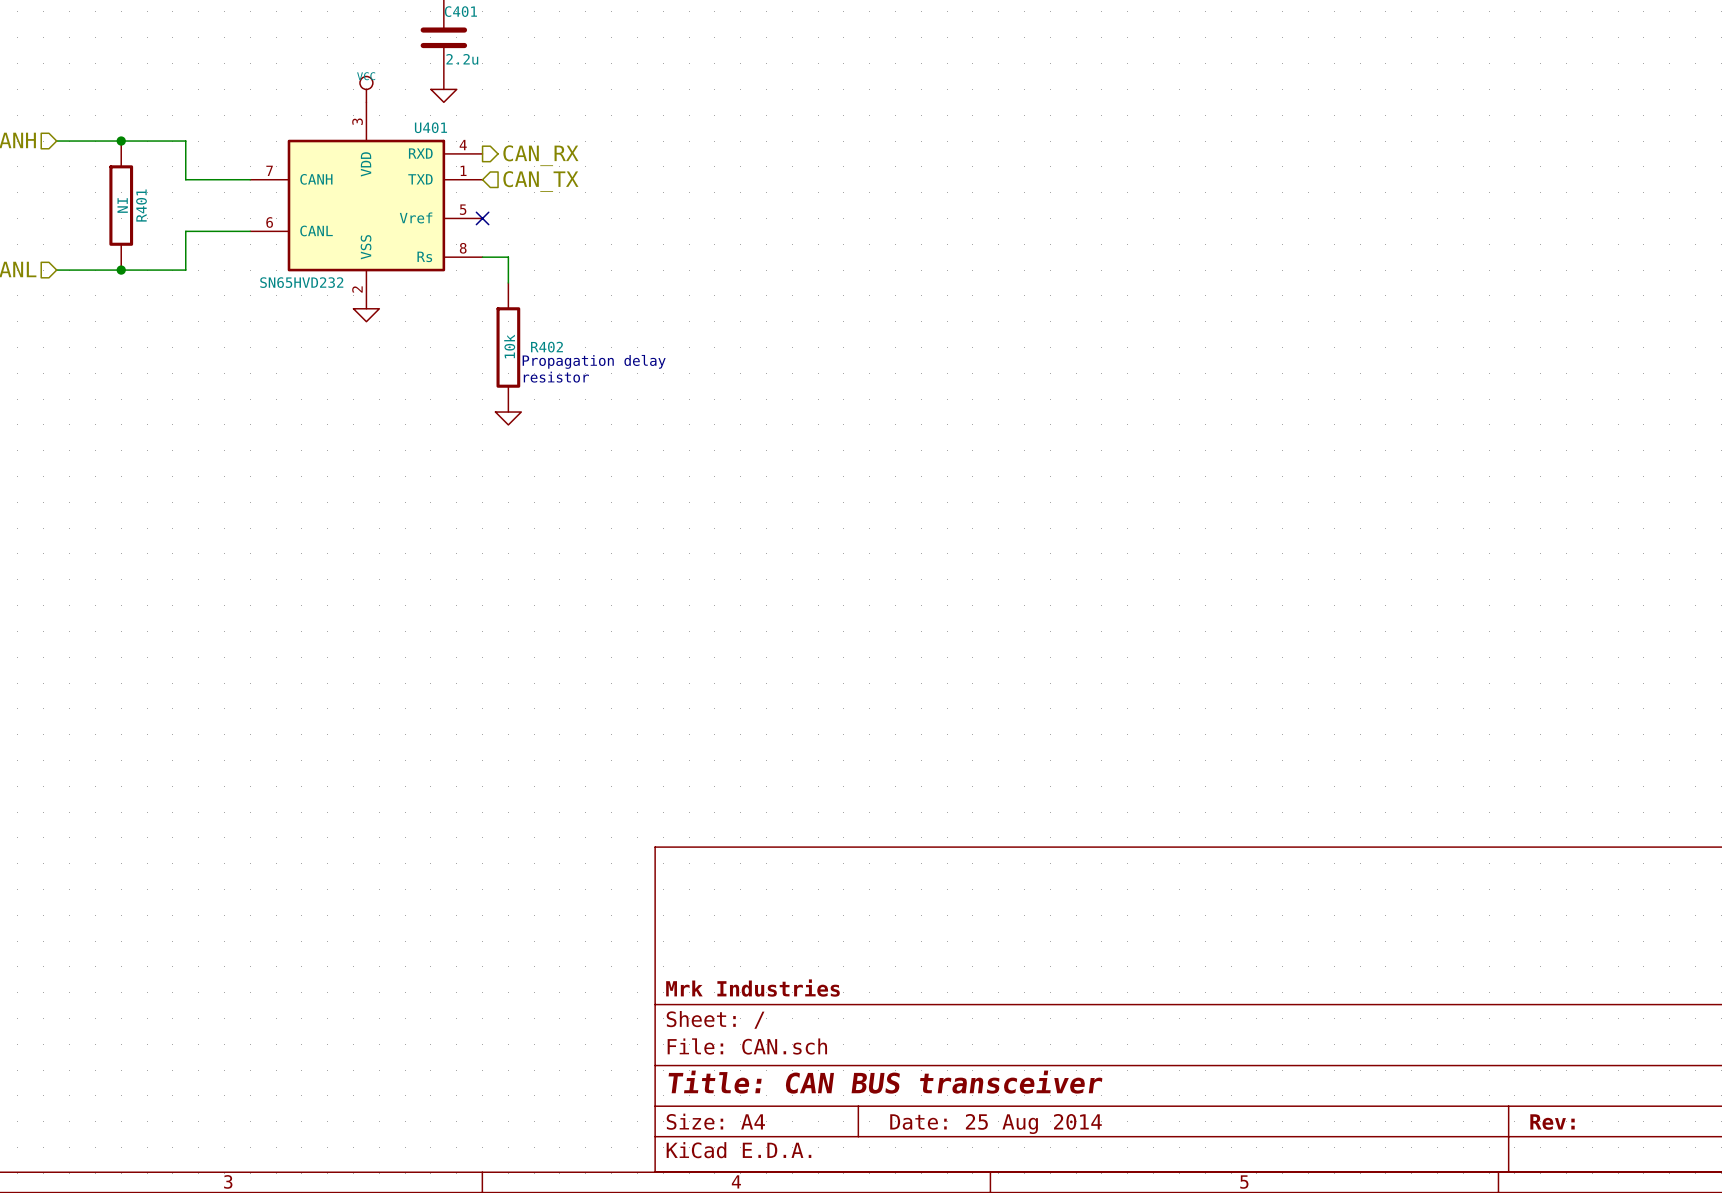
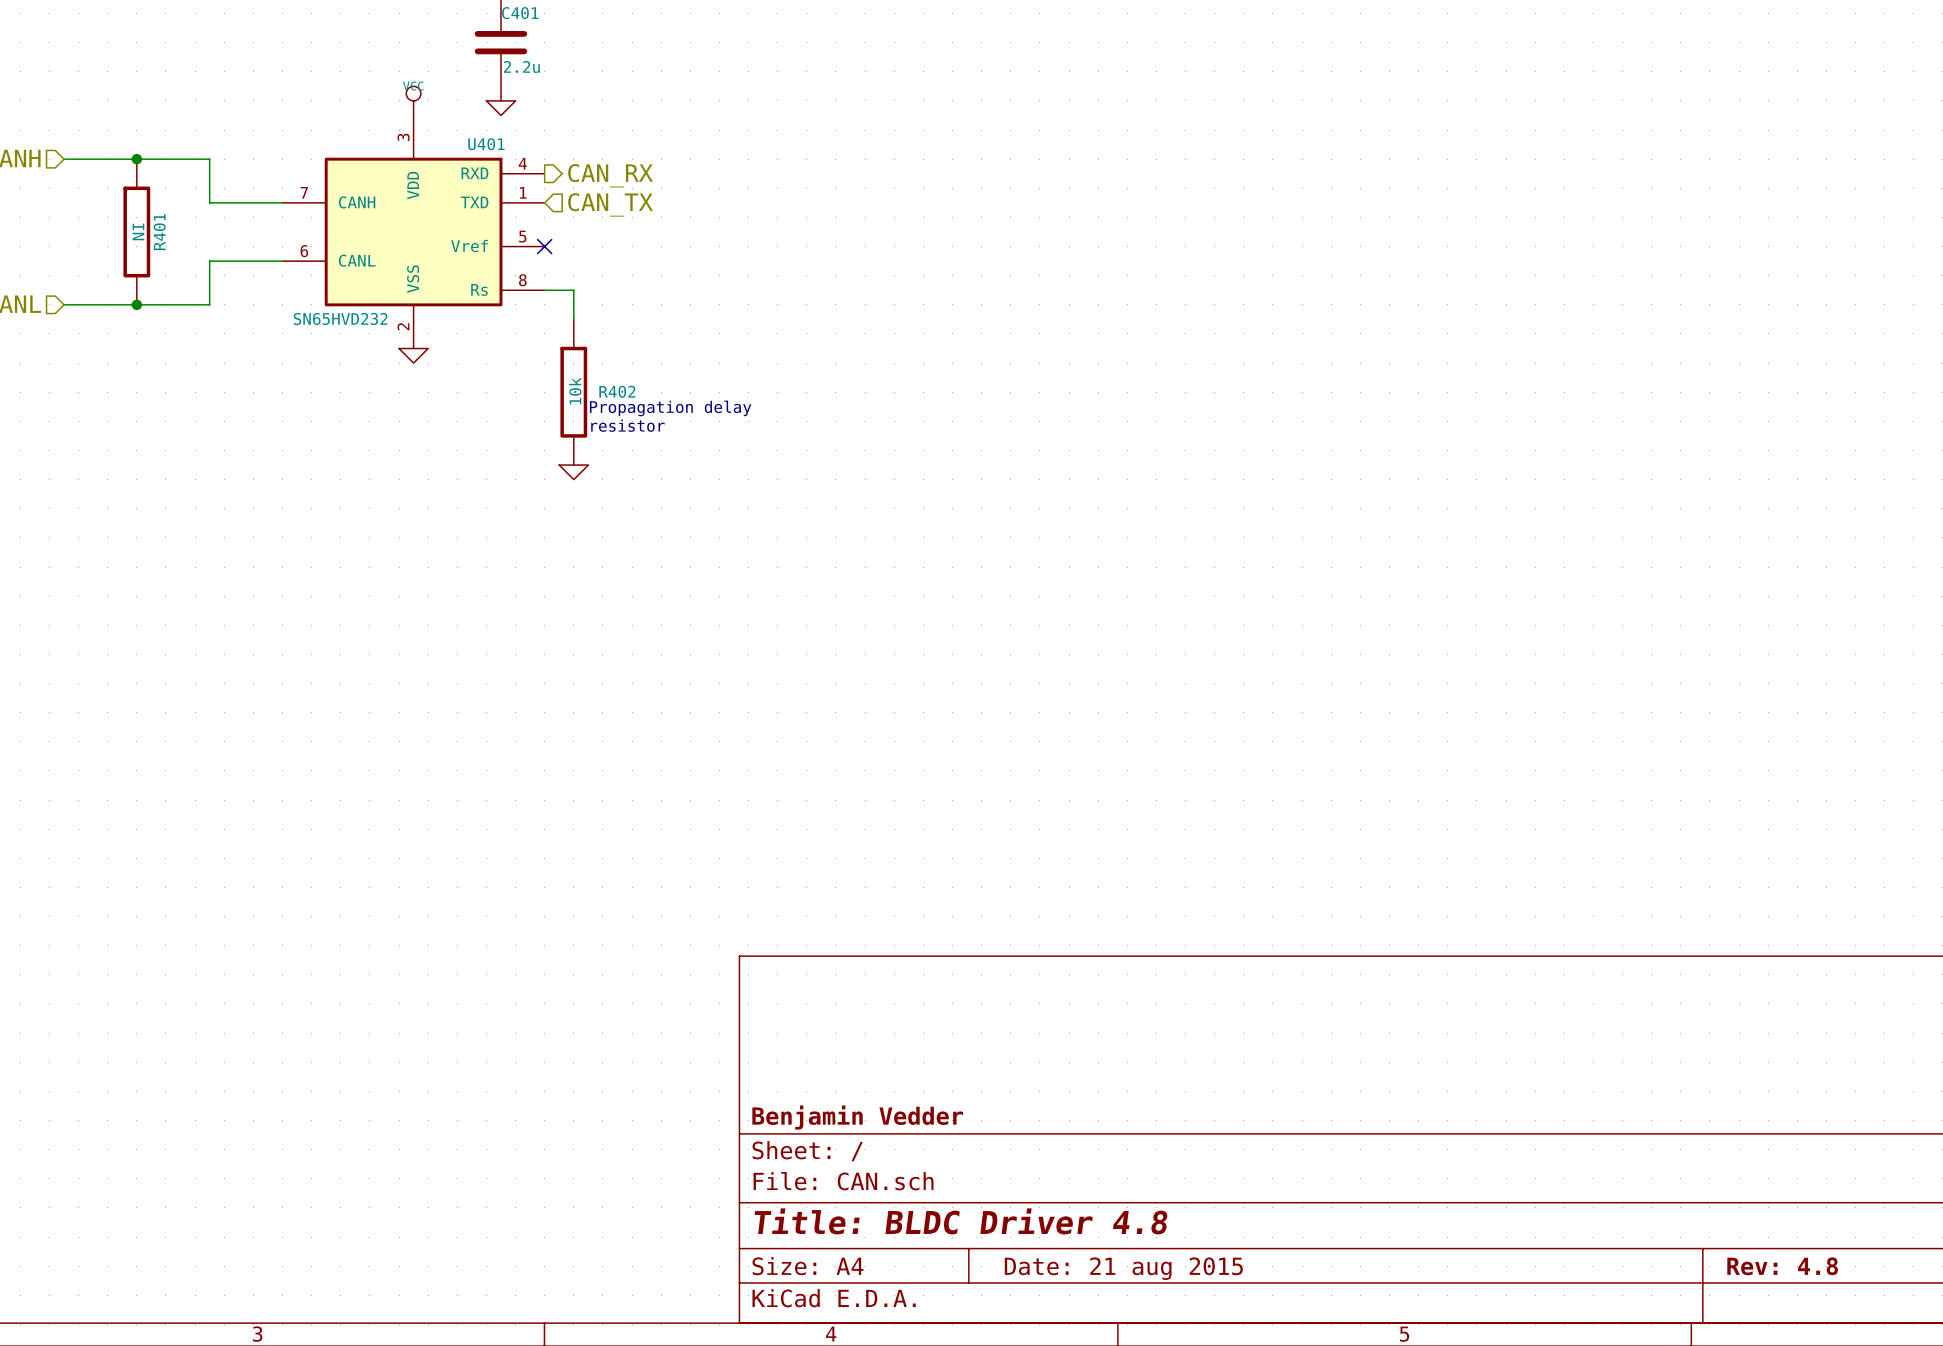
title block: Mrk Industries (752, 988) -> Benjamin Vedder (857, 1117)
title block: Title: CAN BUS transceiver (885, 1082) -> Title: BLDC Driver 4.8 (961, 1221)
title block: Rev: (1552, 1122) -> Rev: 4.8 (1782, 1266)
title block: Date: 25 Aug 2014 (996, 1123) -> Date: 21 aug 2015 (1123, 1268)

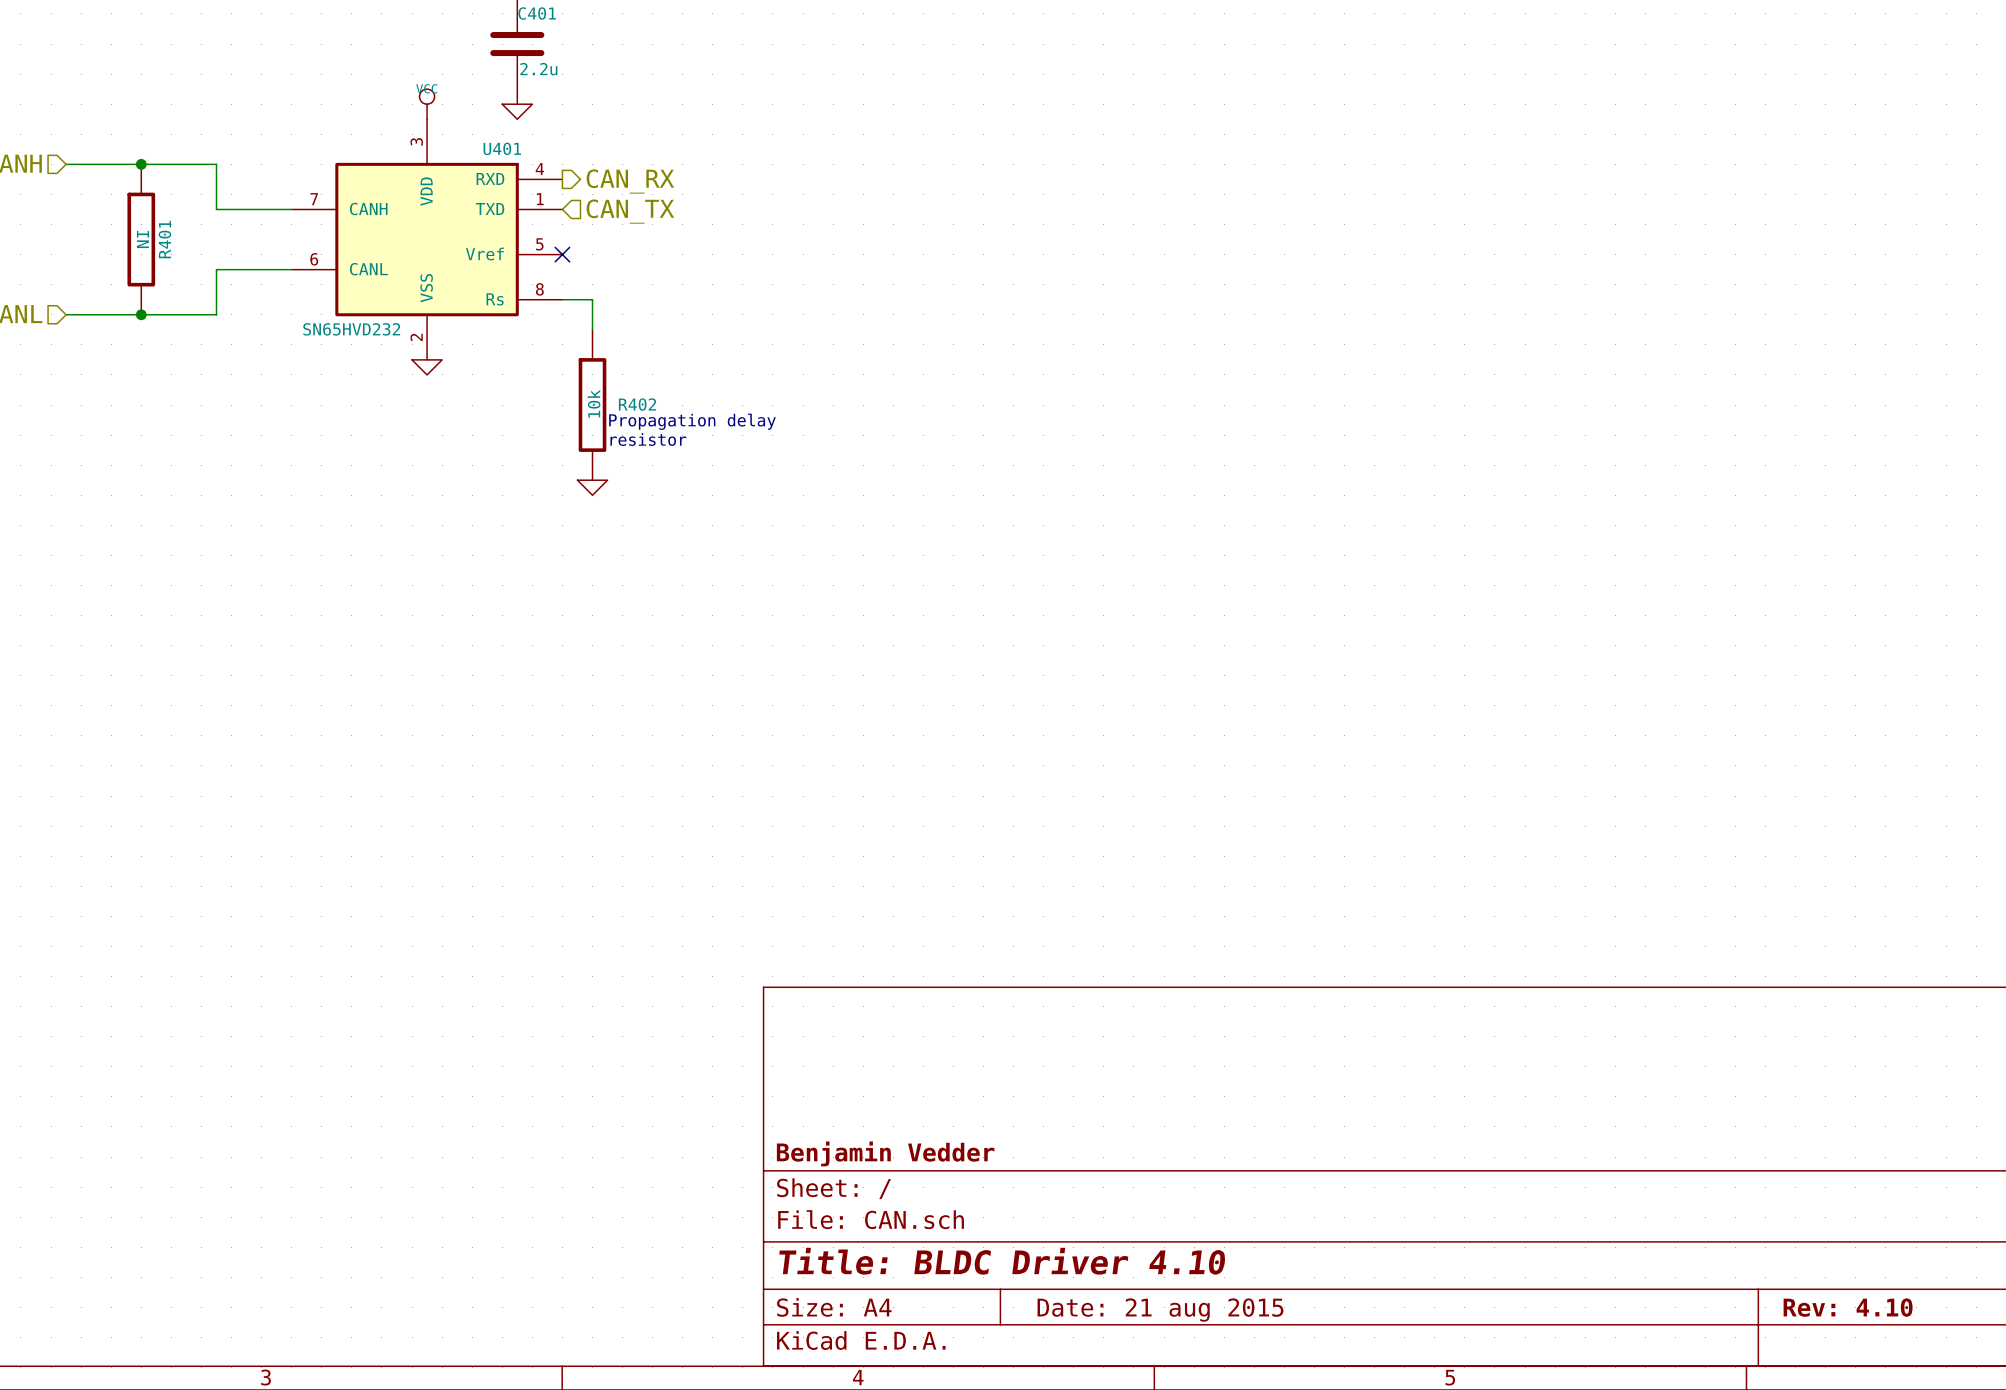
title block: Title: BLDC Driver 4.8 (961, 1221) -> Title: BLDC Driver 4.10 (1002, 1261)
title block: Rev: 4.8 (1782, 1266) -> Rev: 4.10 (1848, 1307)

